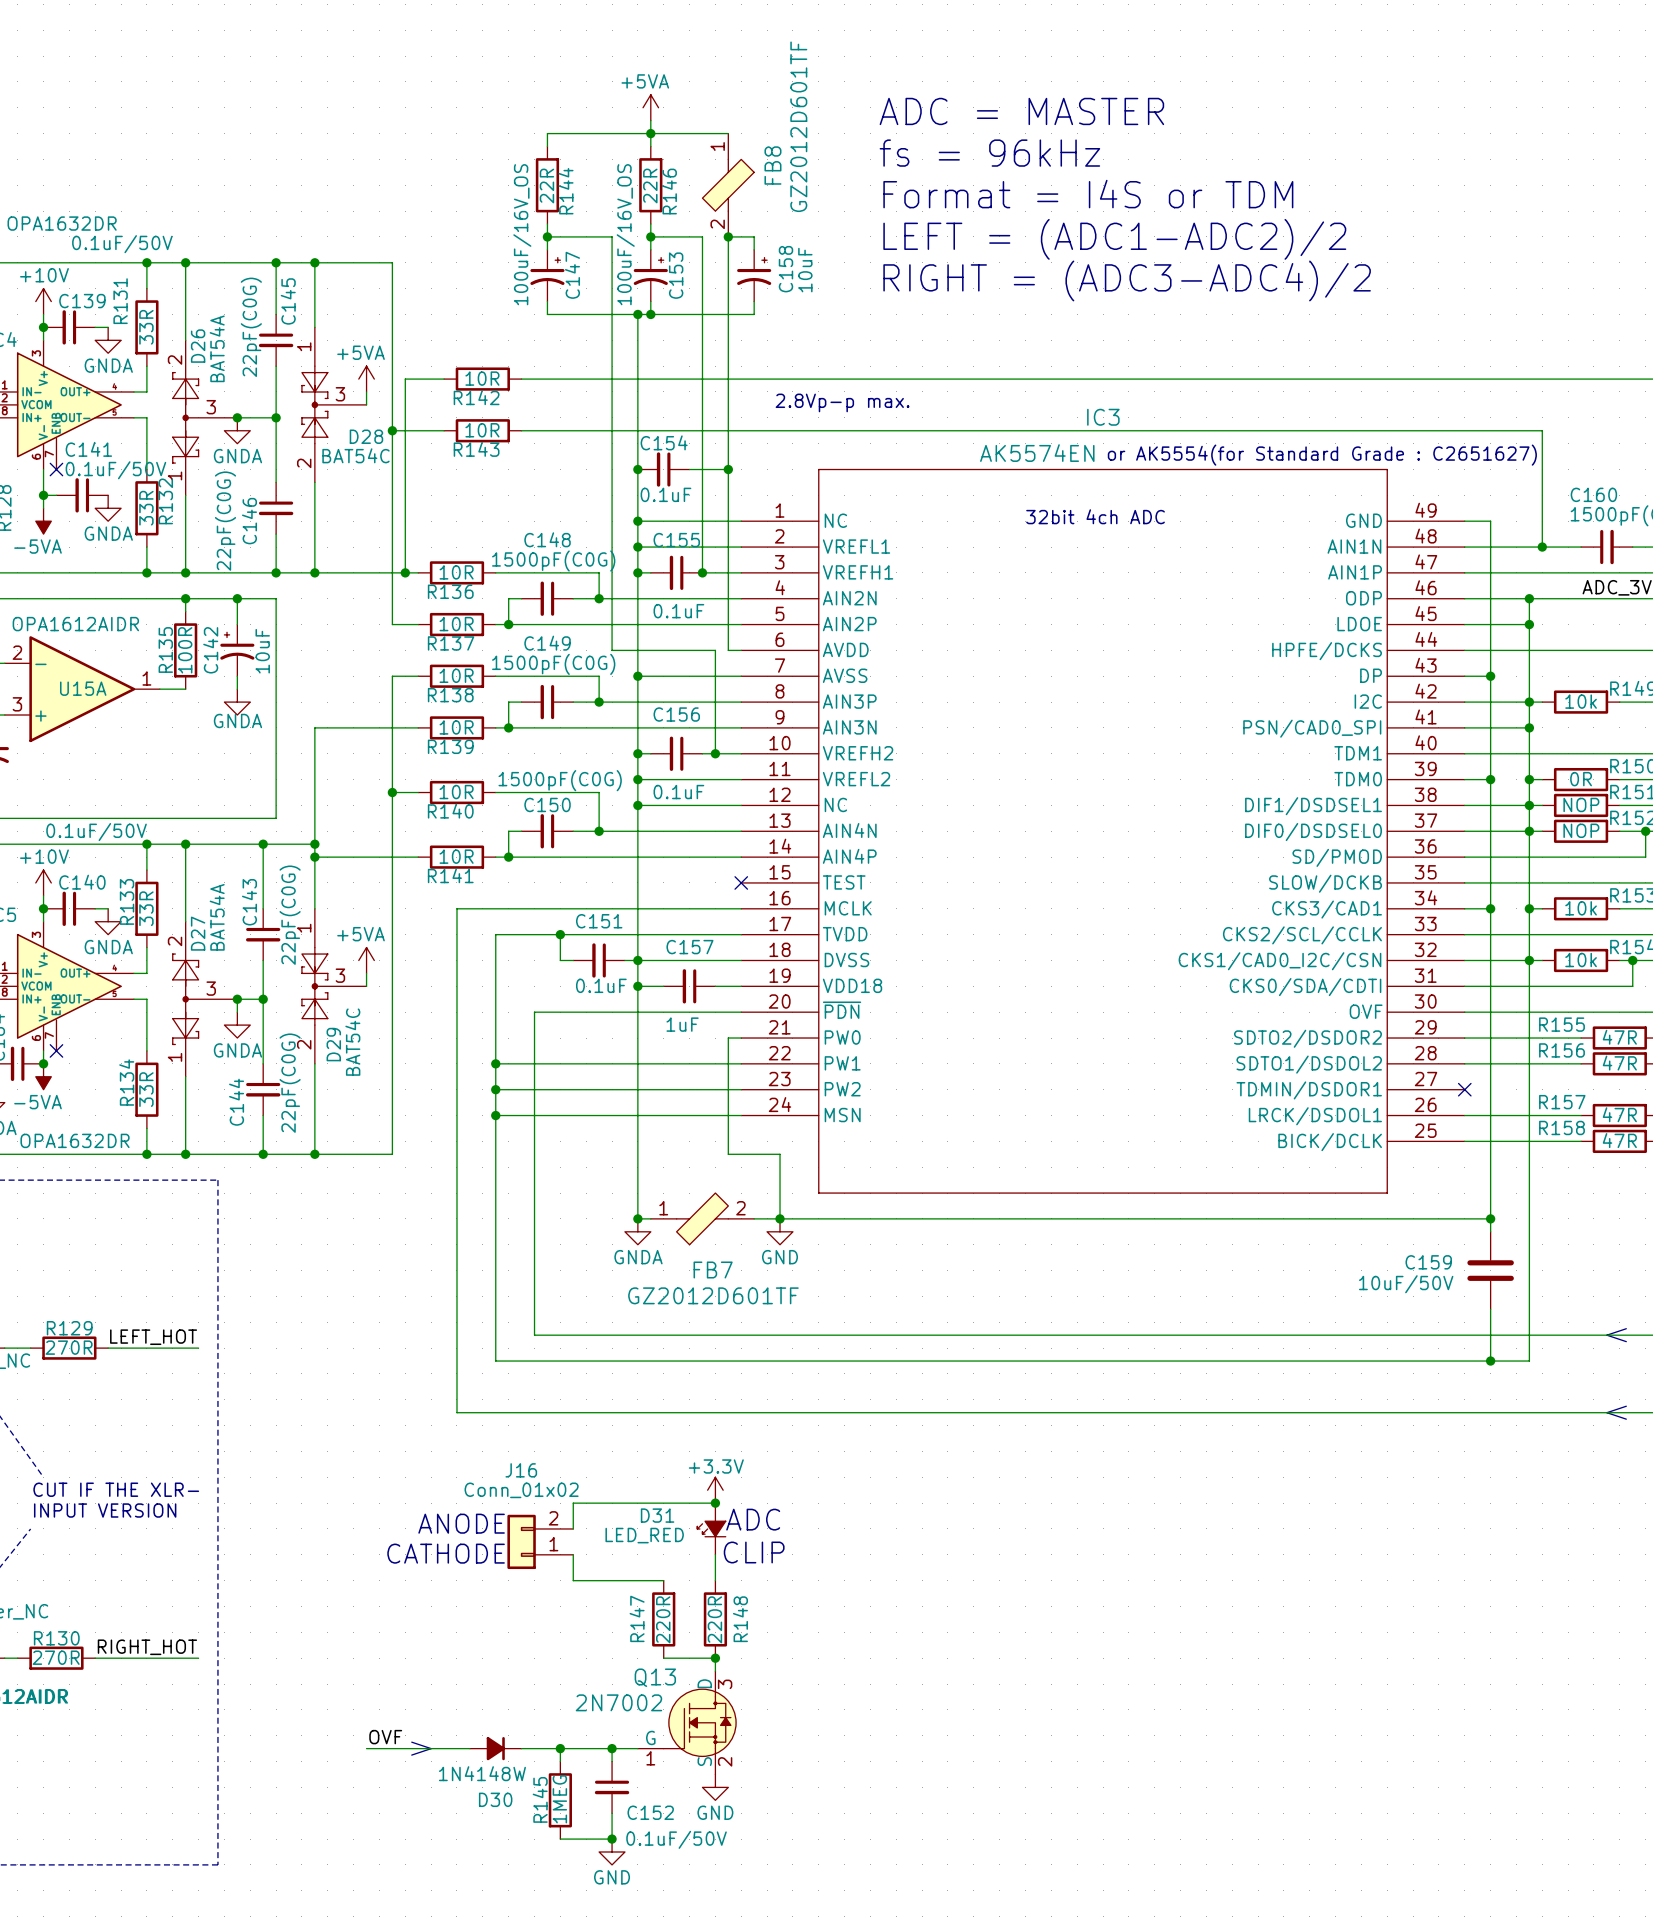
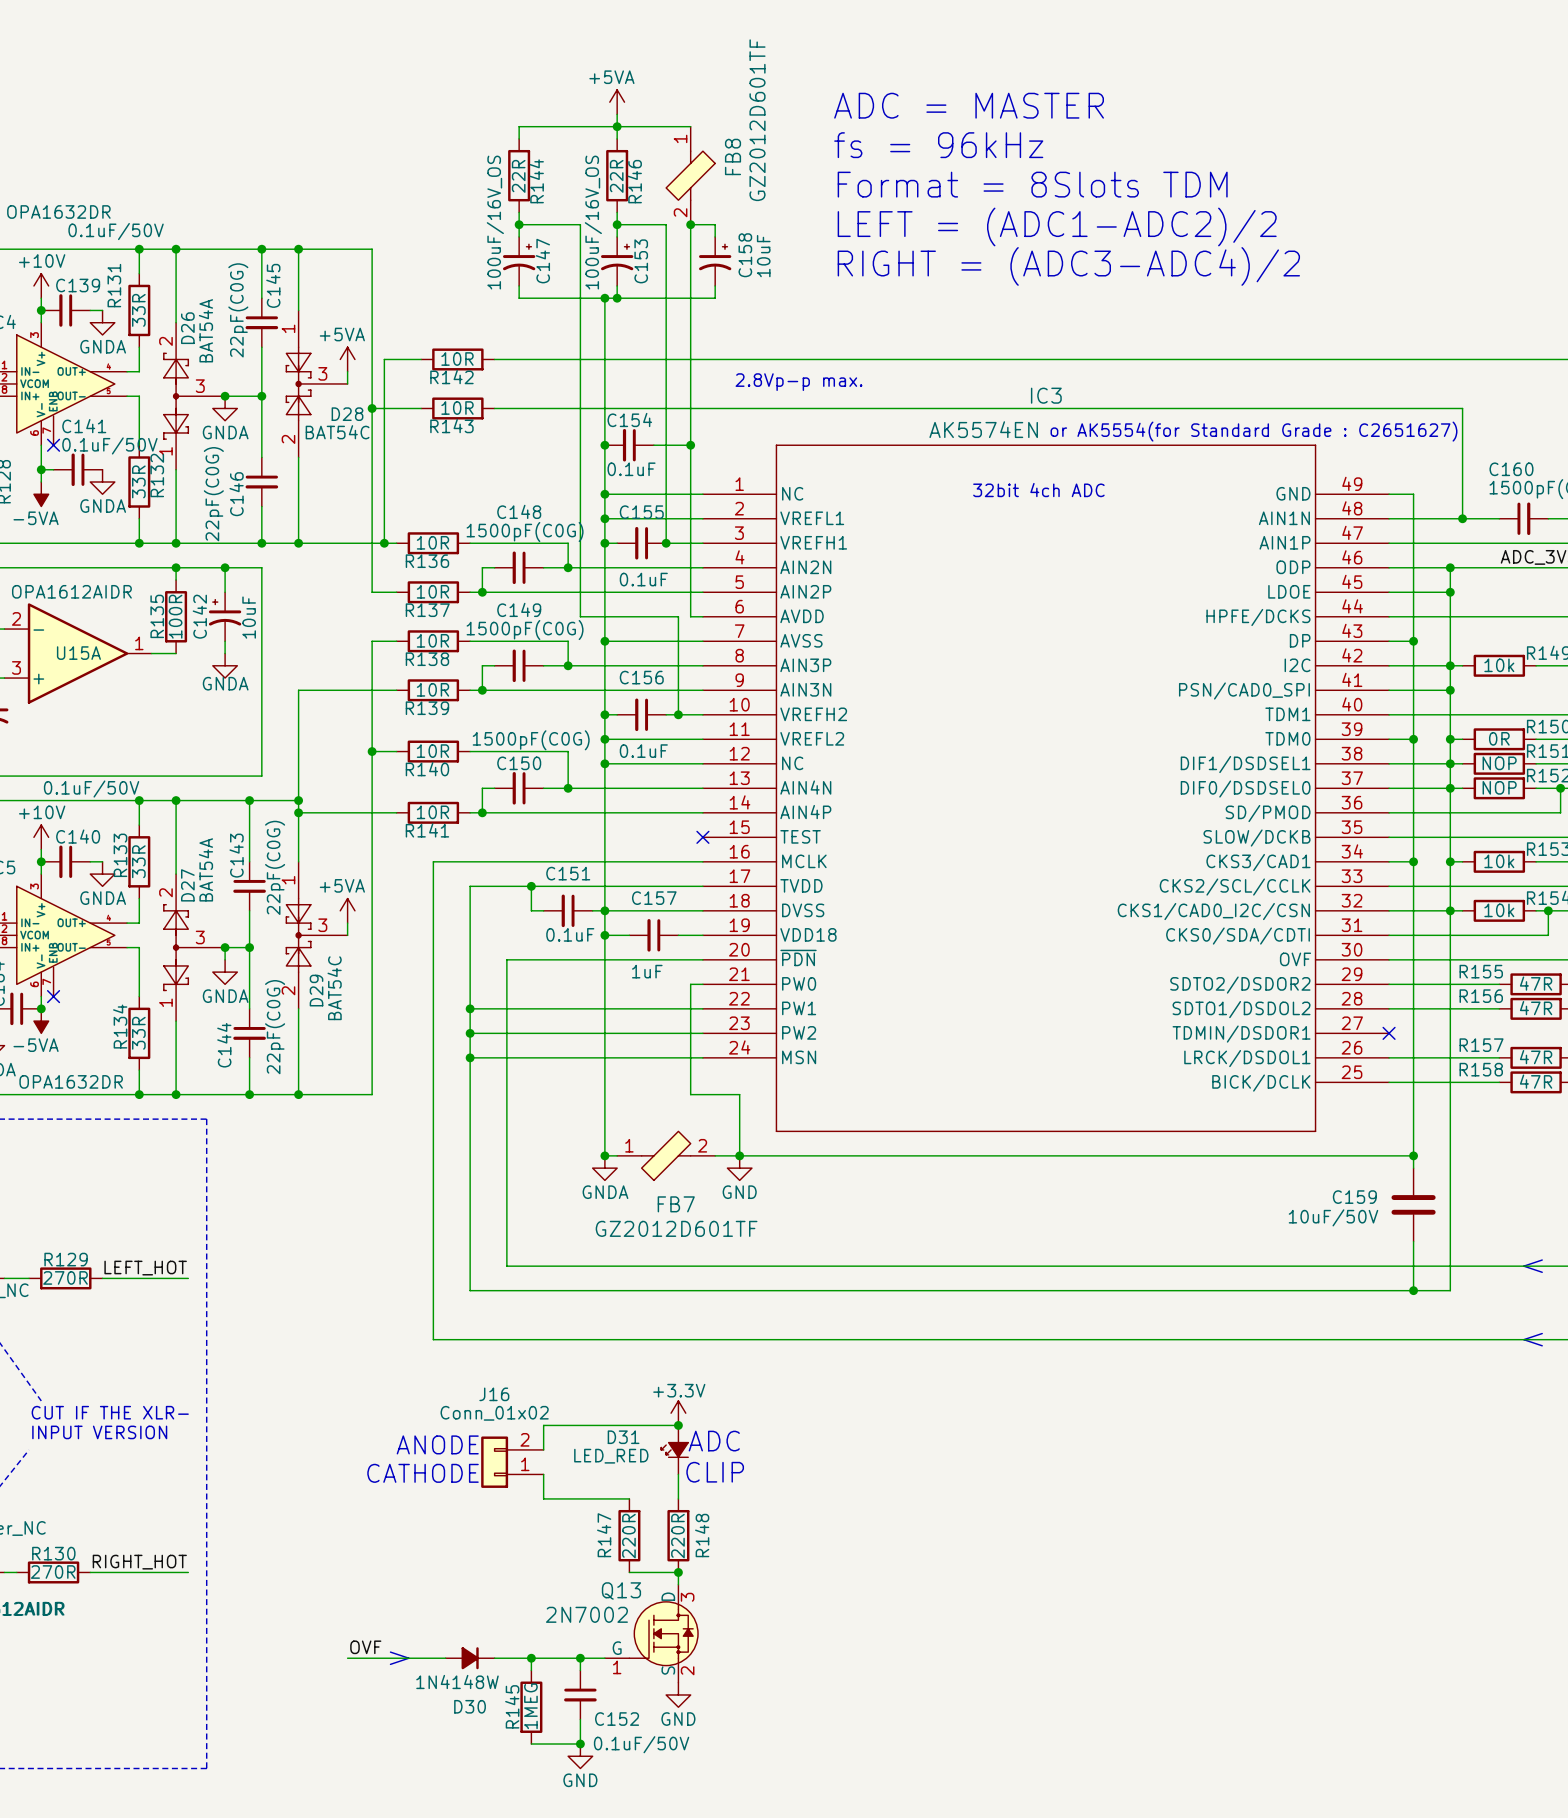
text: Format = I4S or TDM (1088, 194) -> Format = 8Slots TDM (1032, 184)

